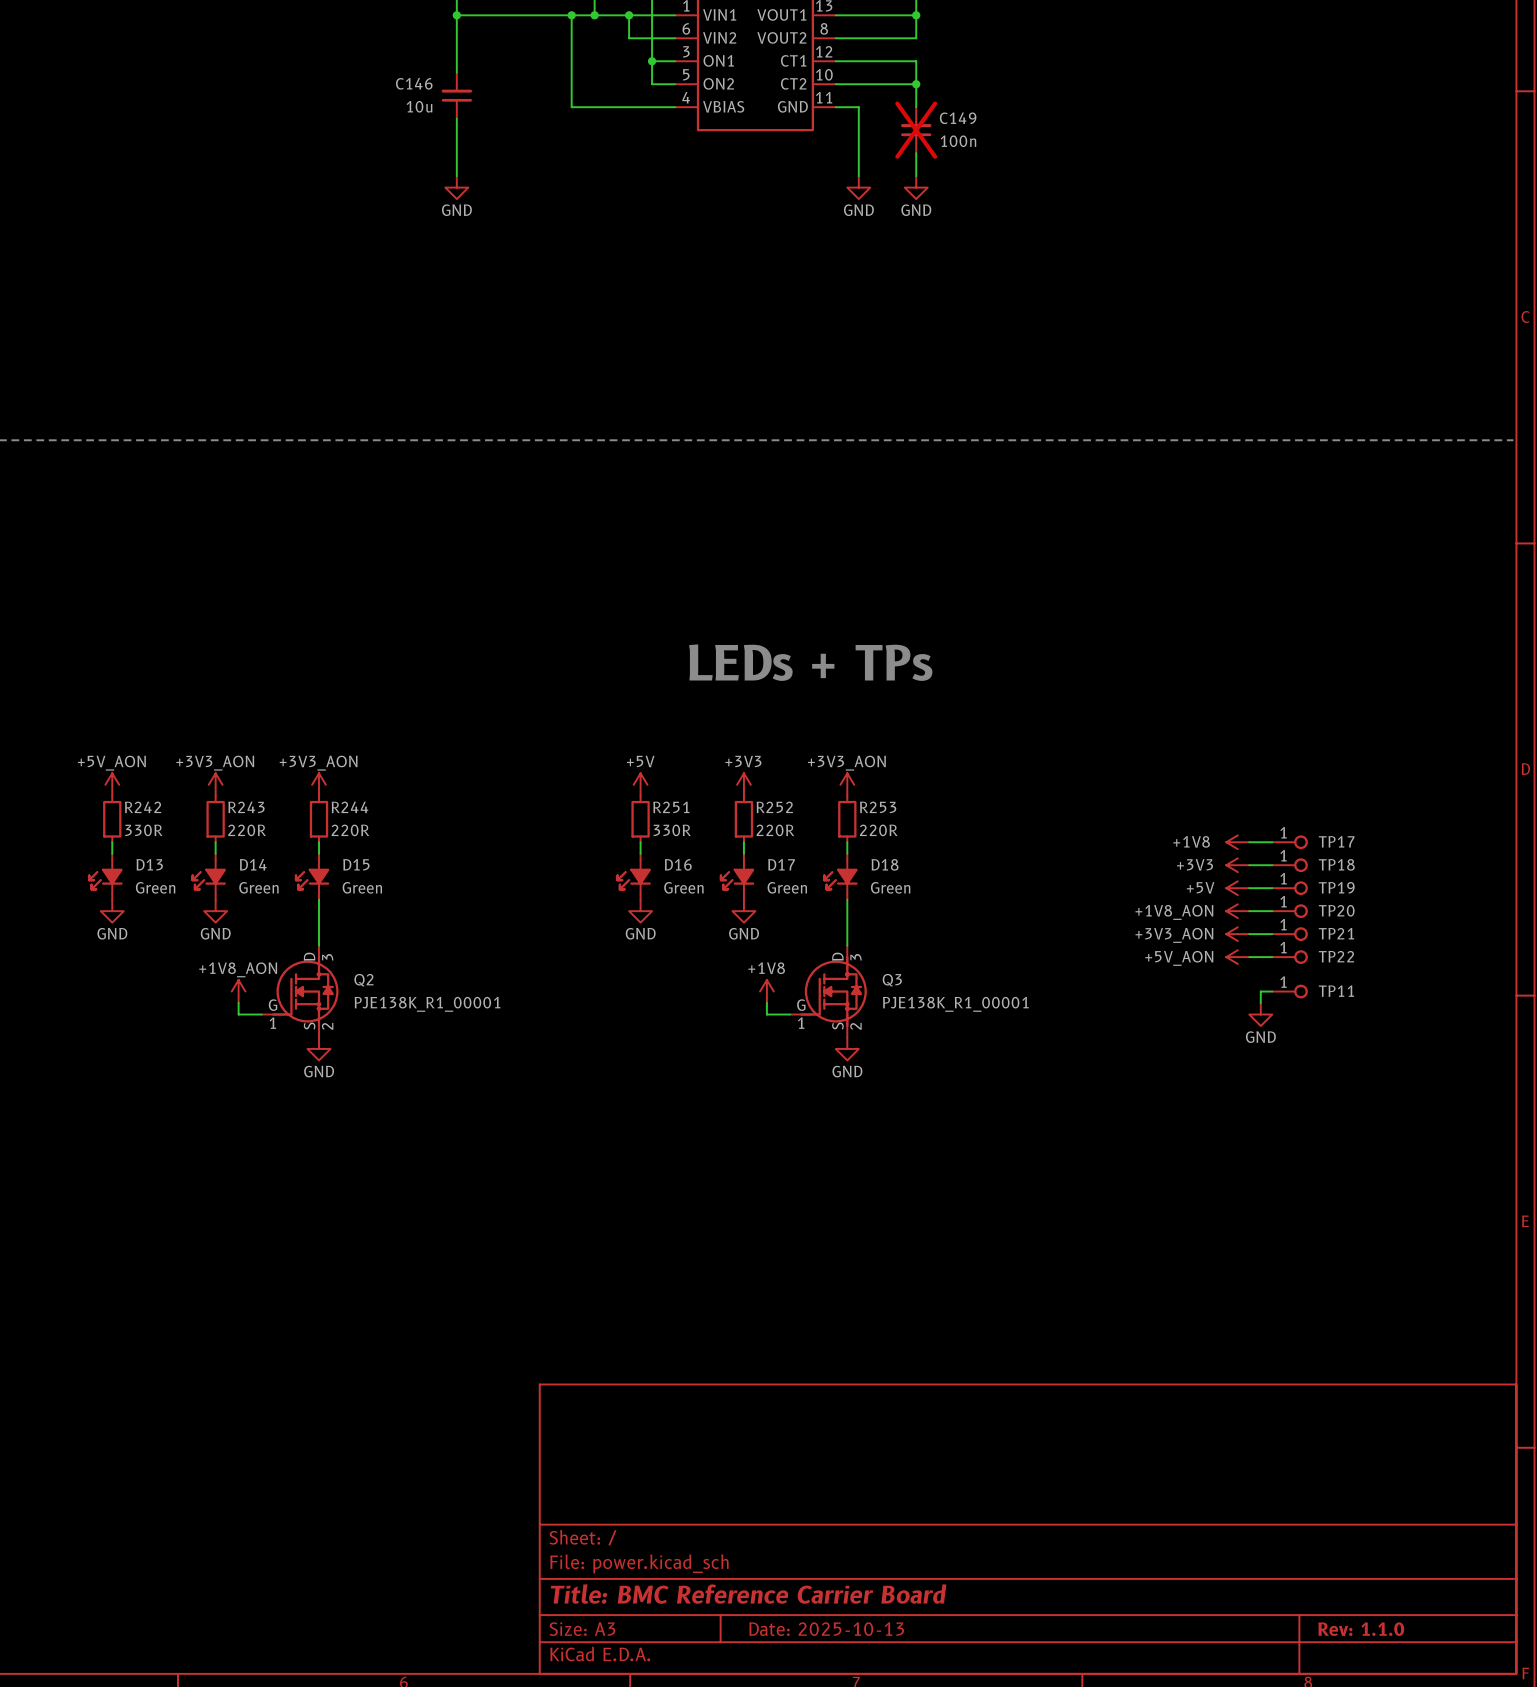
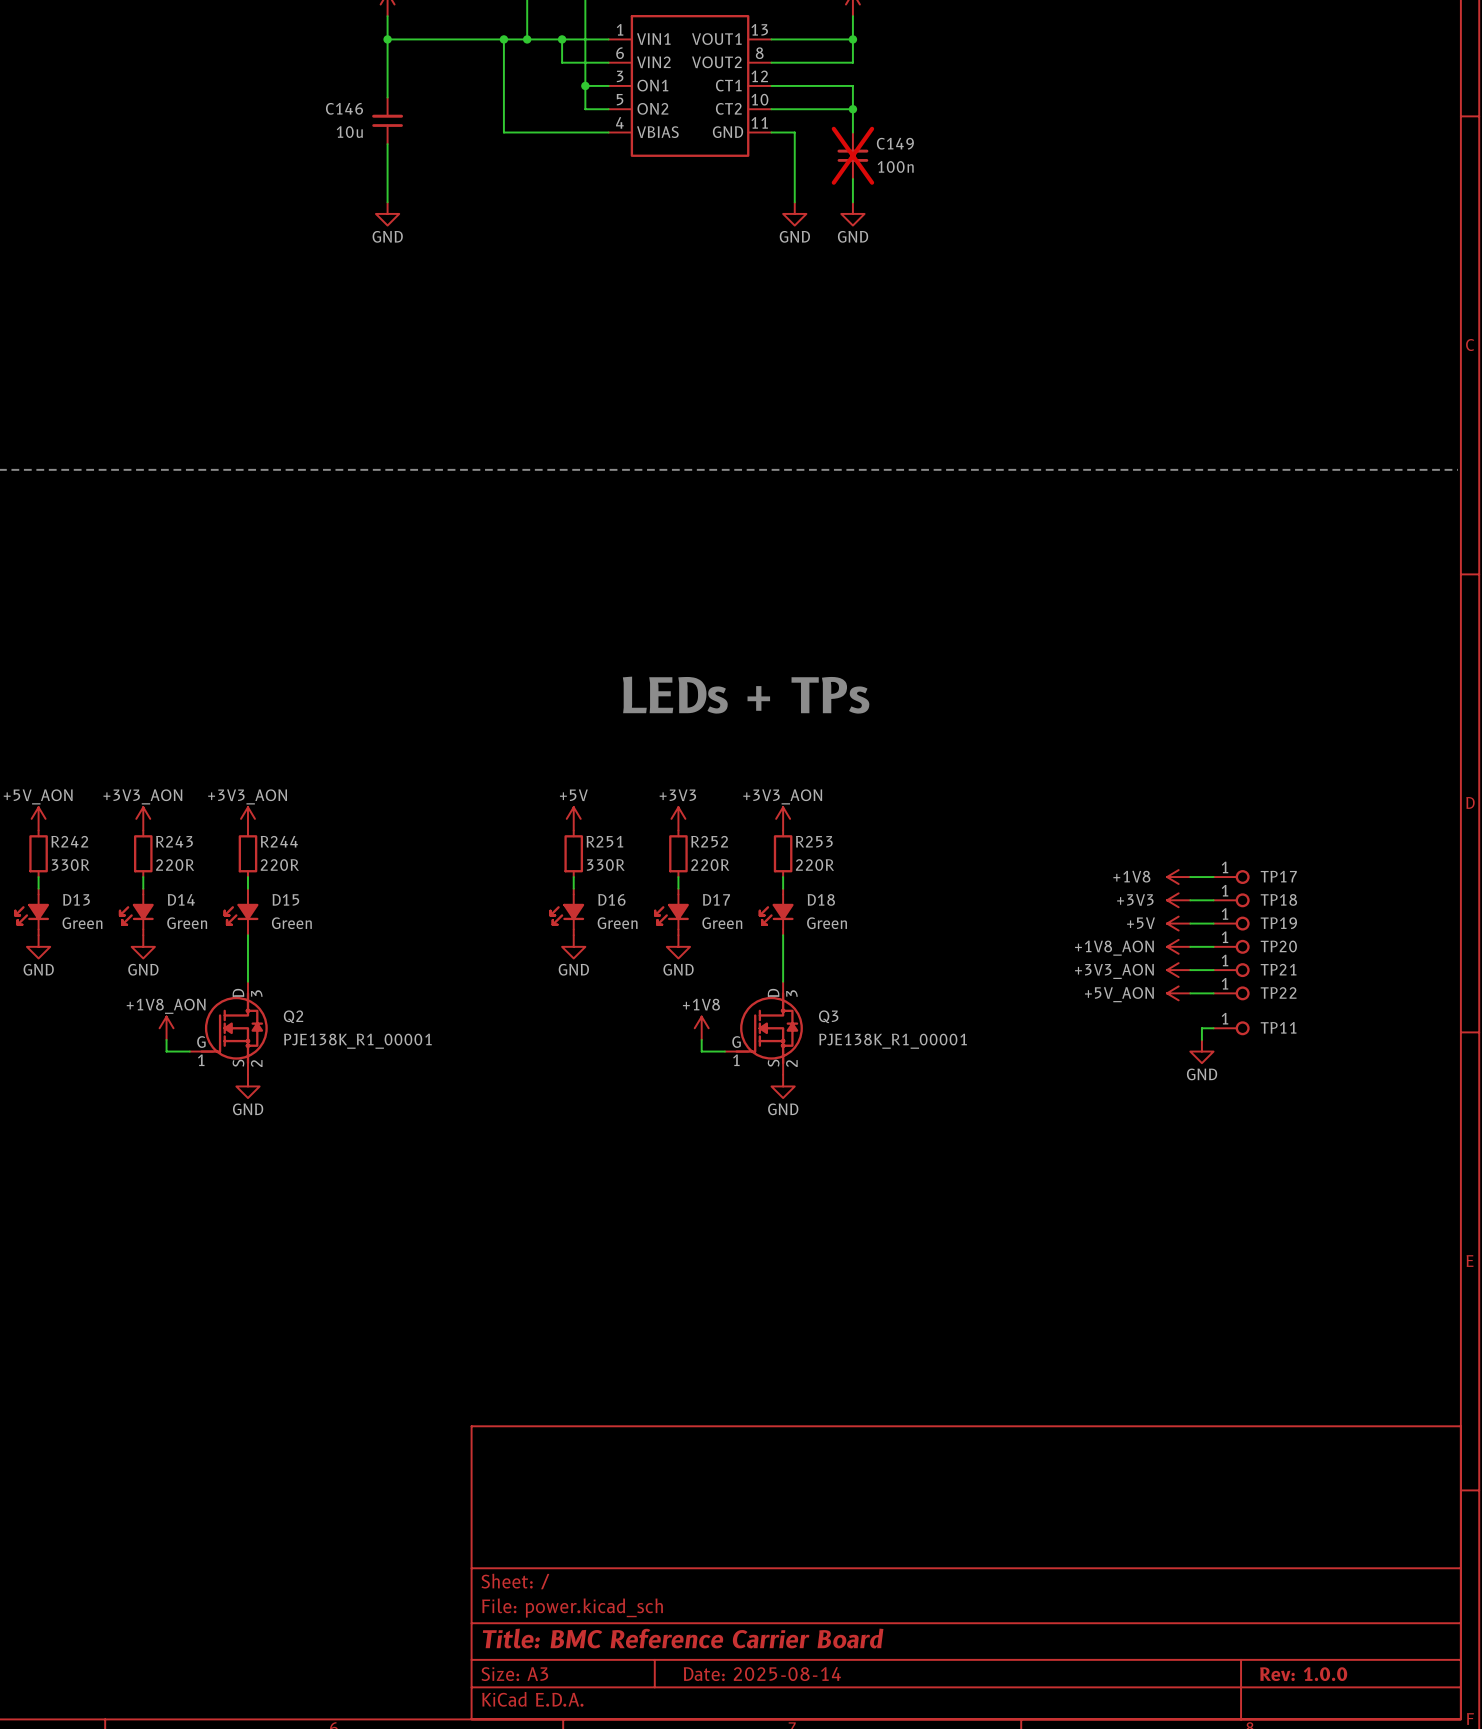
title block: Date: 2025-10-13 (826, 1629) -> Date: 2025-08-14 (762, 1674)
title block: Rev: 1.1.0 (1361, 1629) -> Rev: 1.0.0 (1303, 1674)

